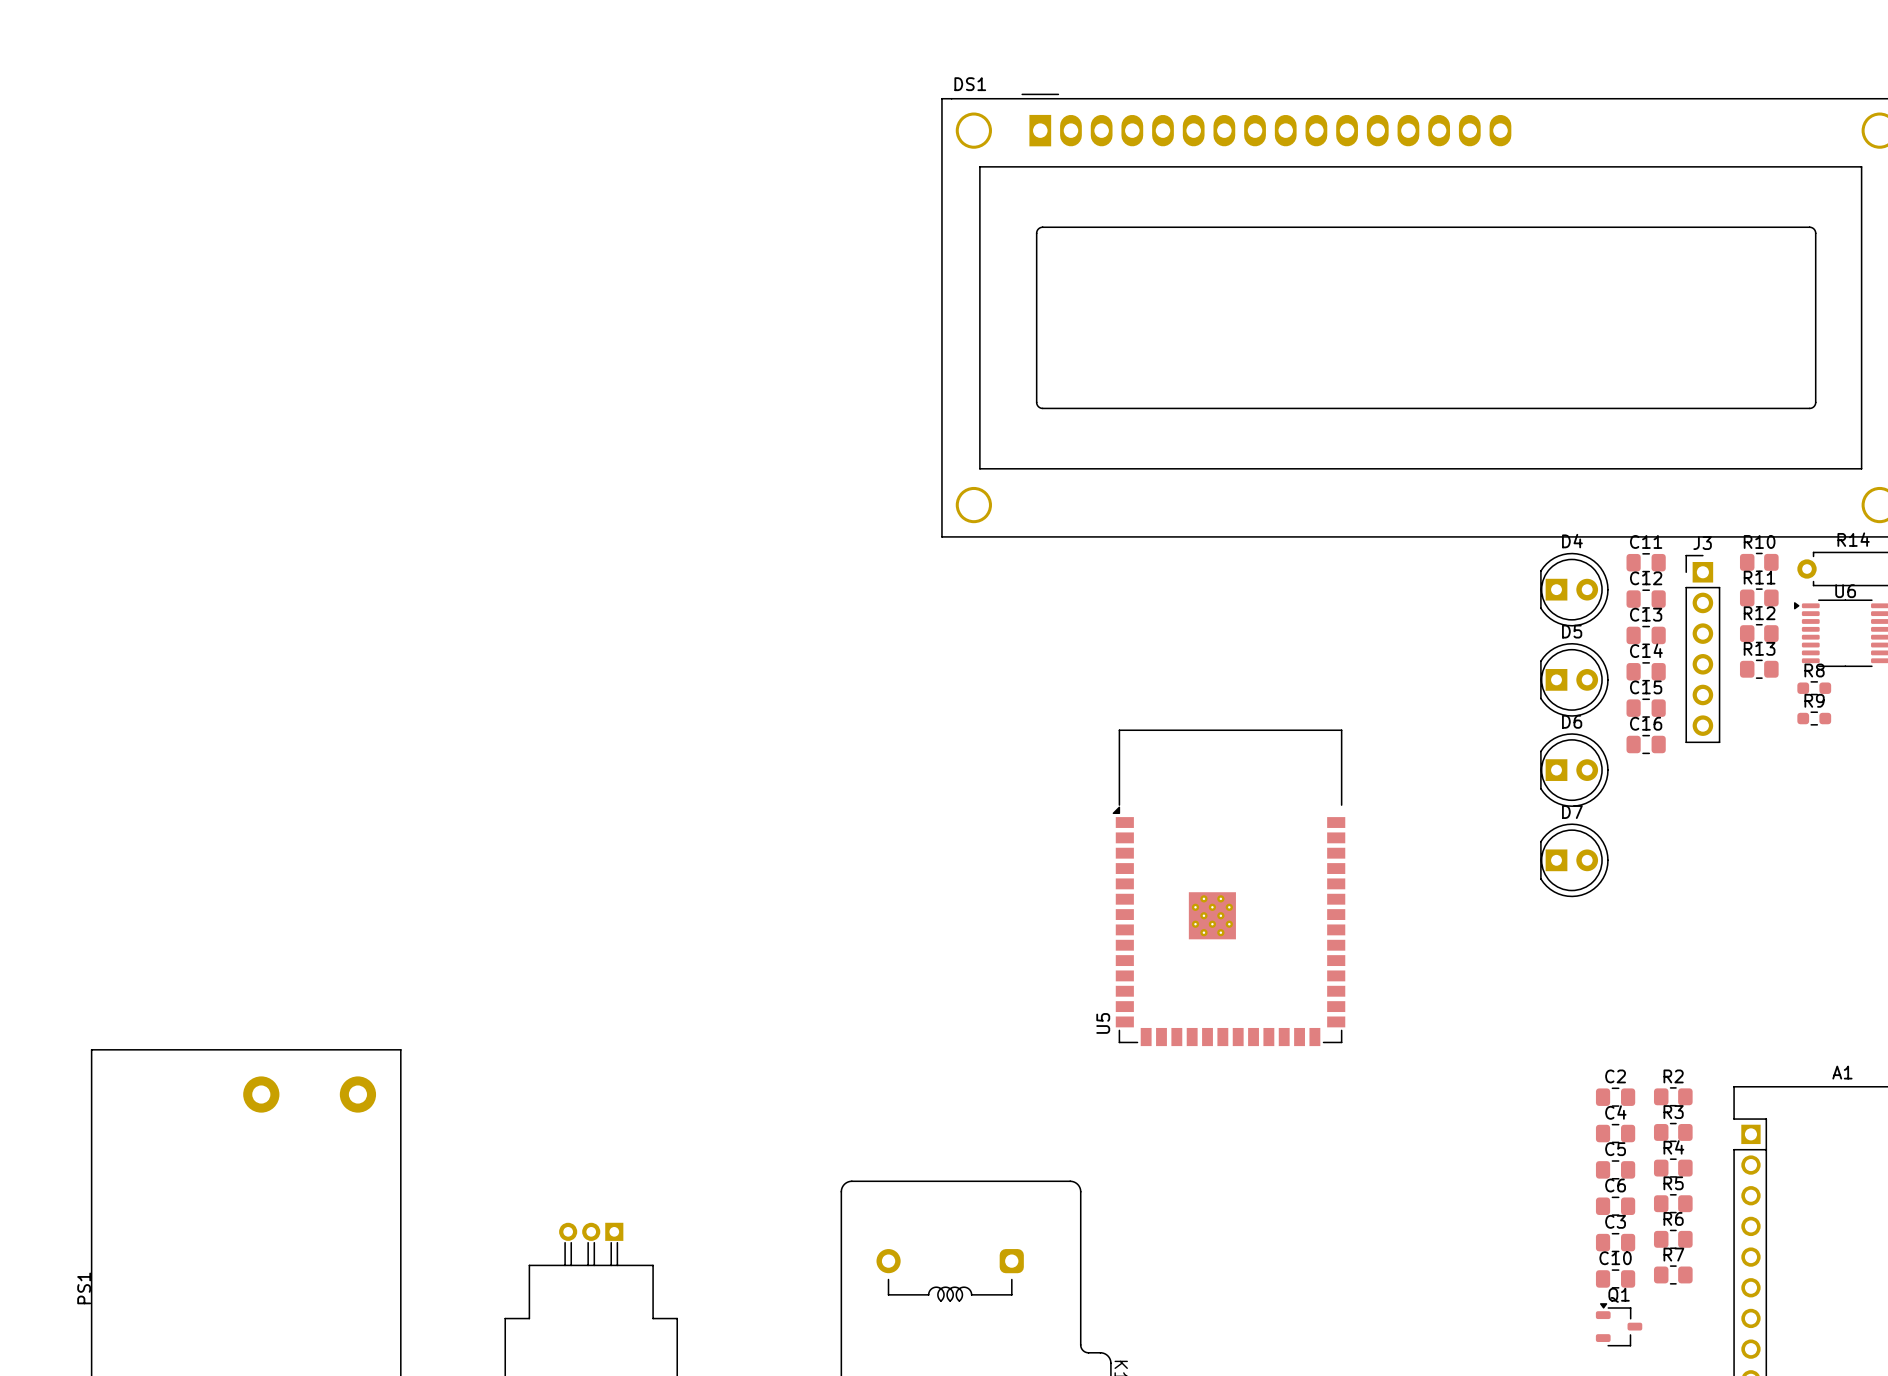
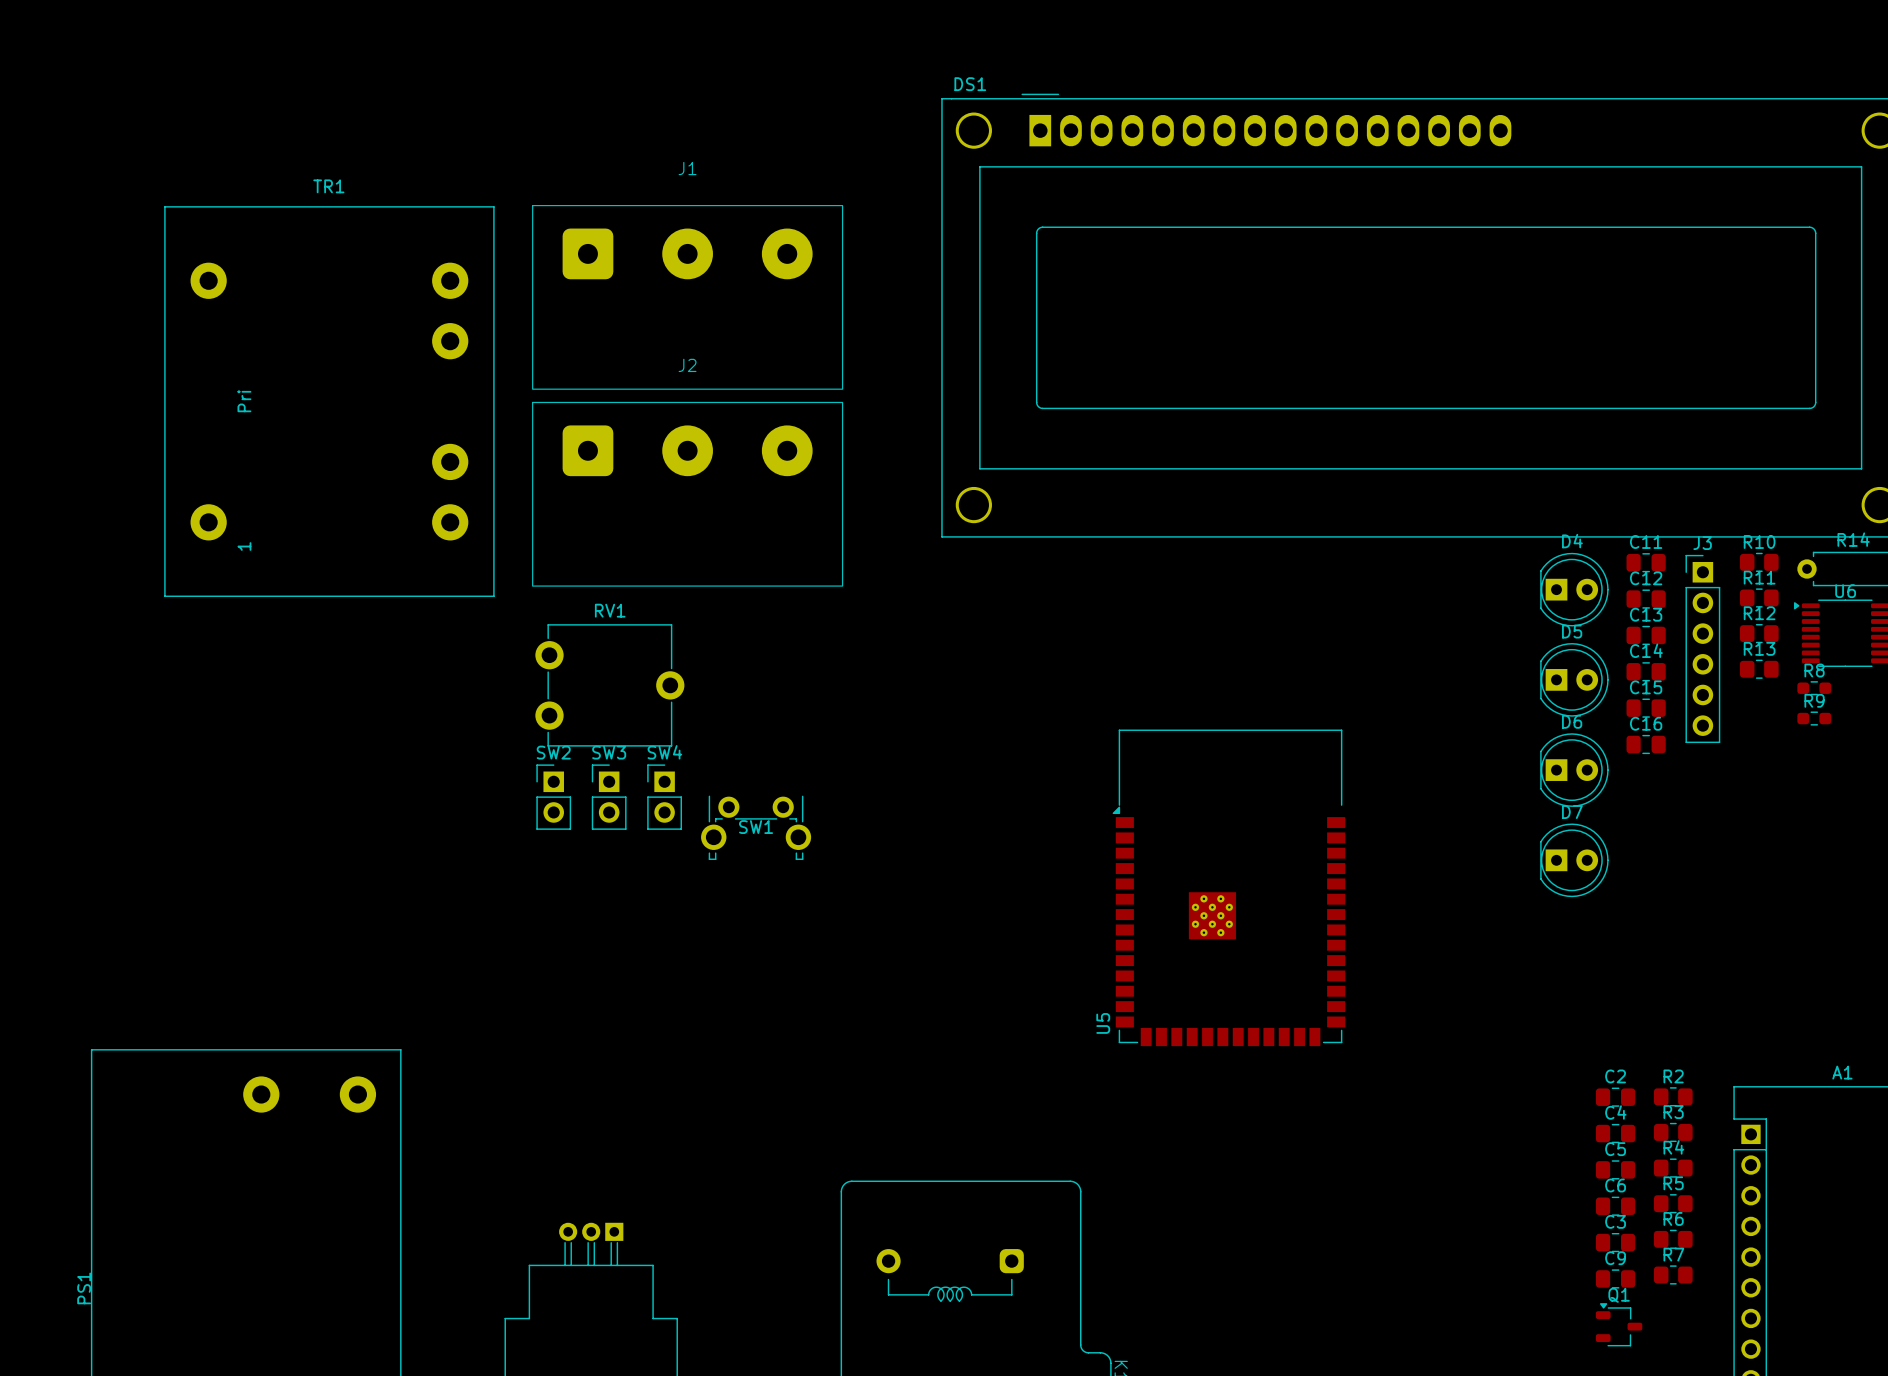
J1: none -> (687, 297)
TR1: none -> (329, 401)
J2: none -> (687, 494)
RV1: none -> (609, 685)
SW2: none -> (553, 797)
SW3: none -> (609, 797)
SW4: none -> (664, 797)
SW1: none -> (756, 827)
C10 name: C10 (1615, 1258) -> C9 (1615, 1258)

